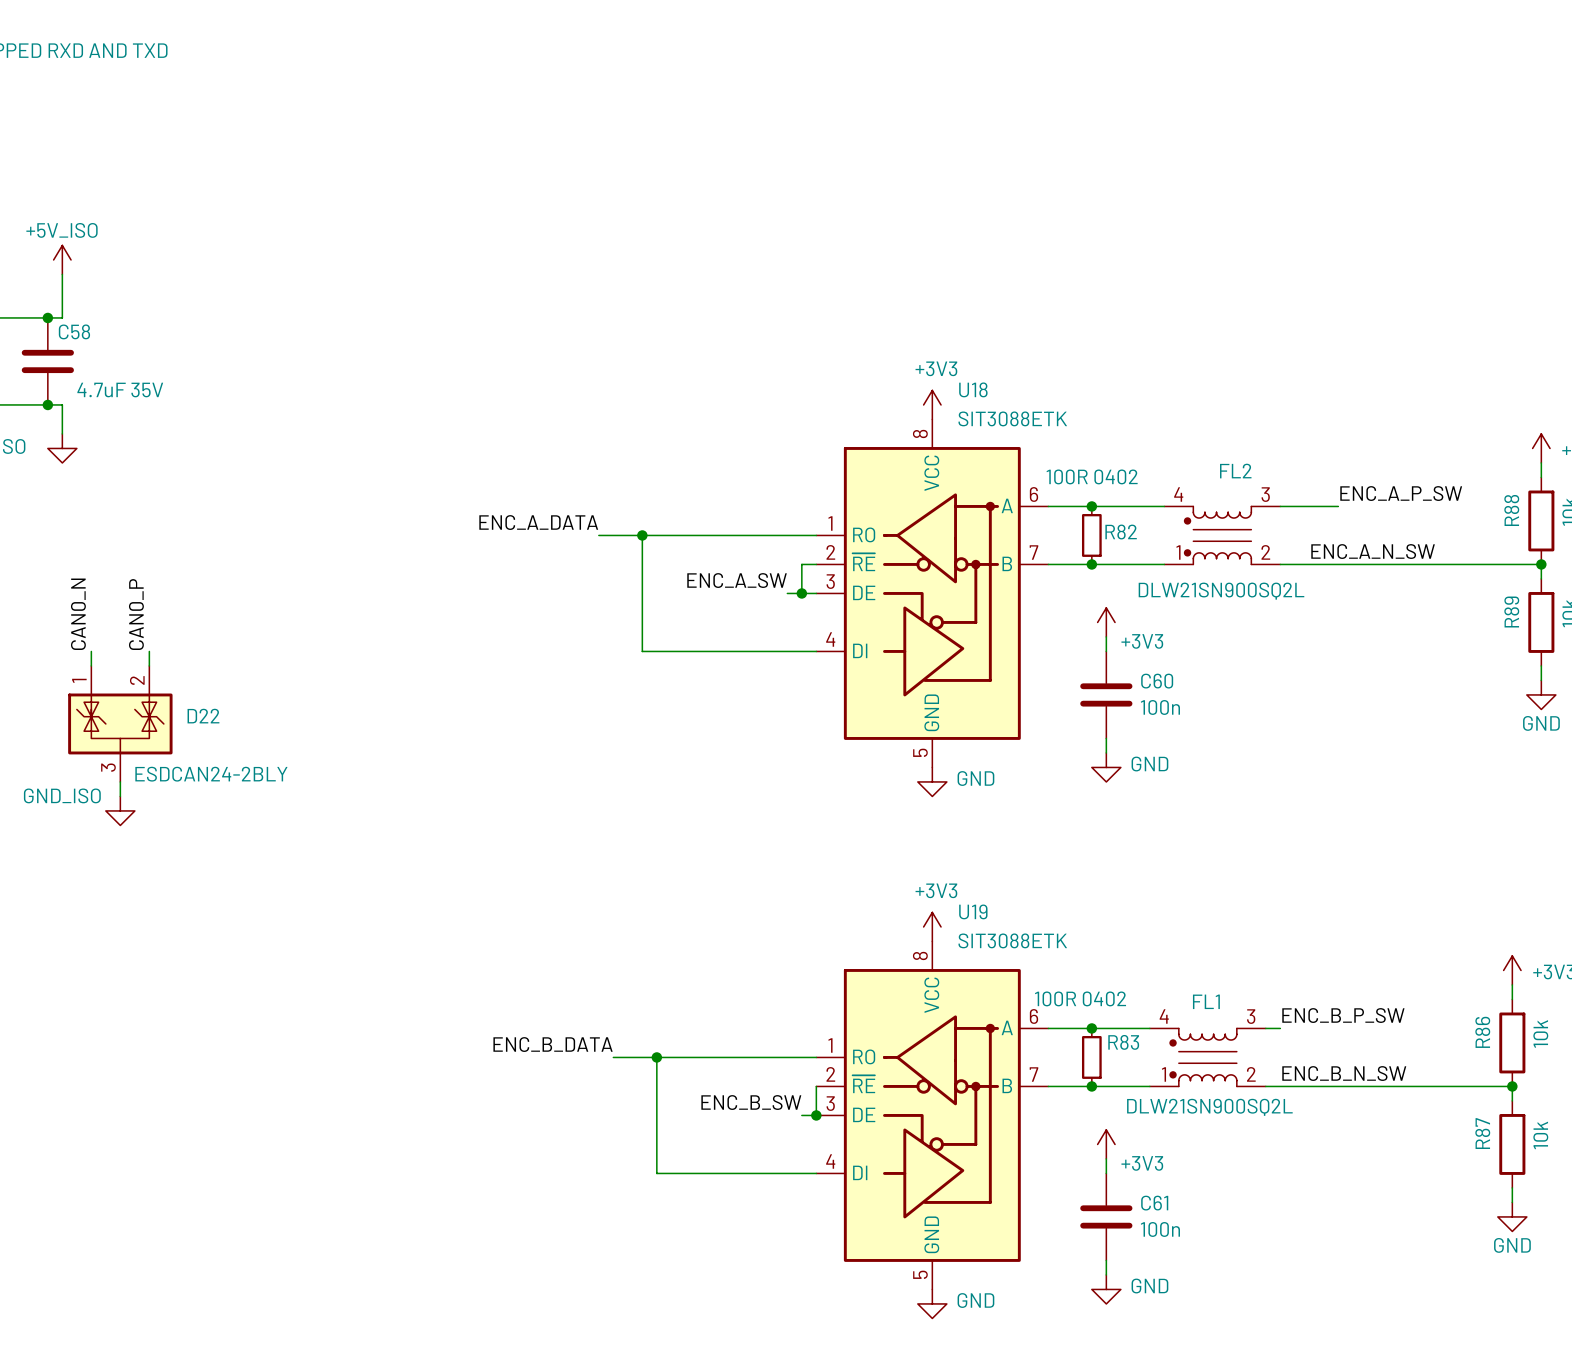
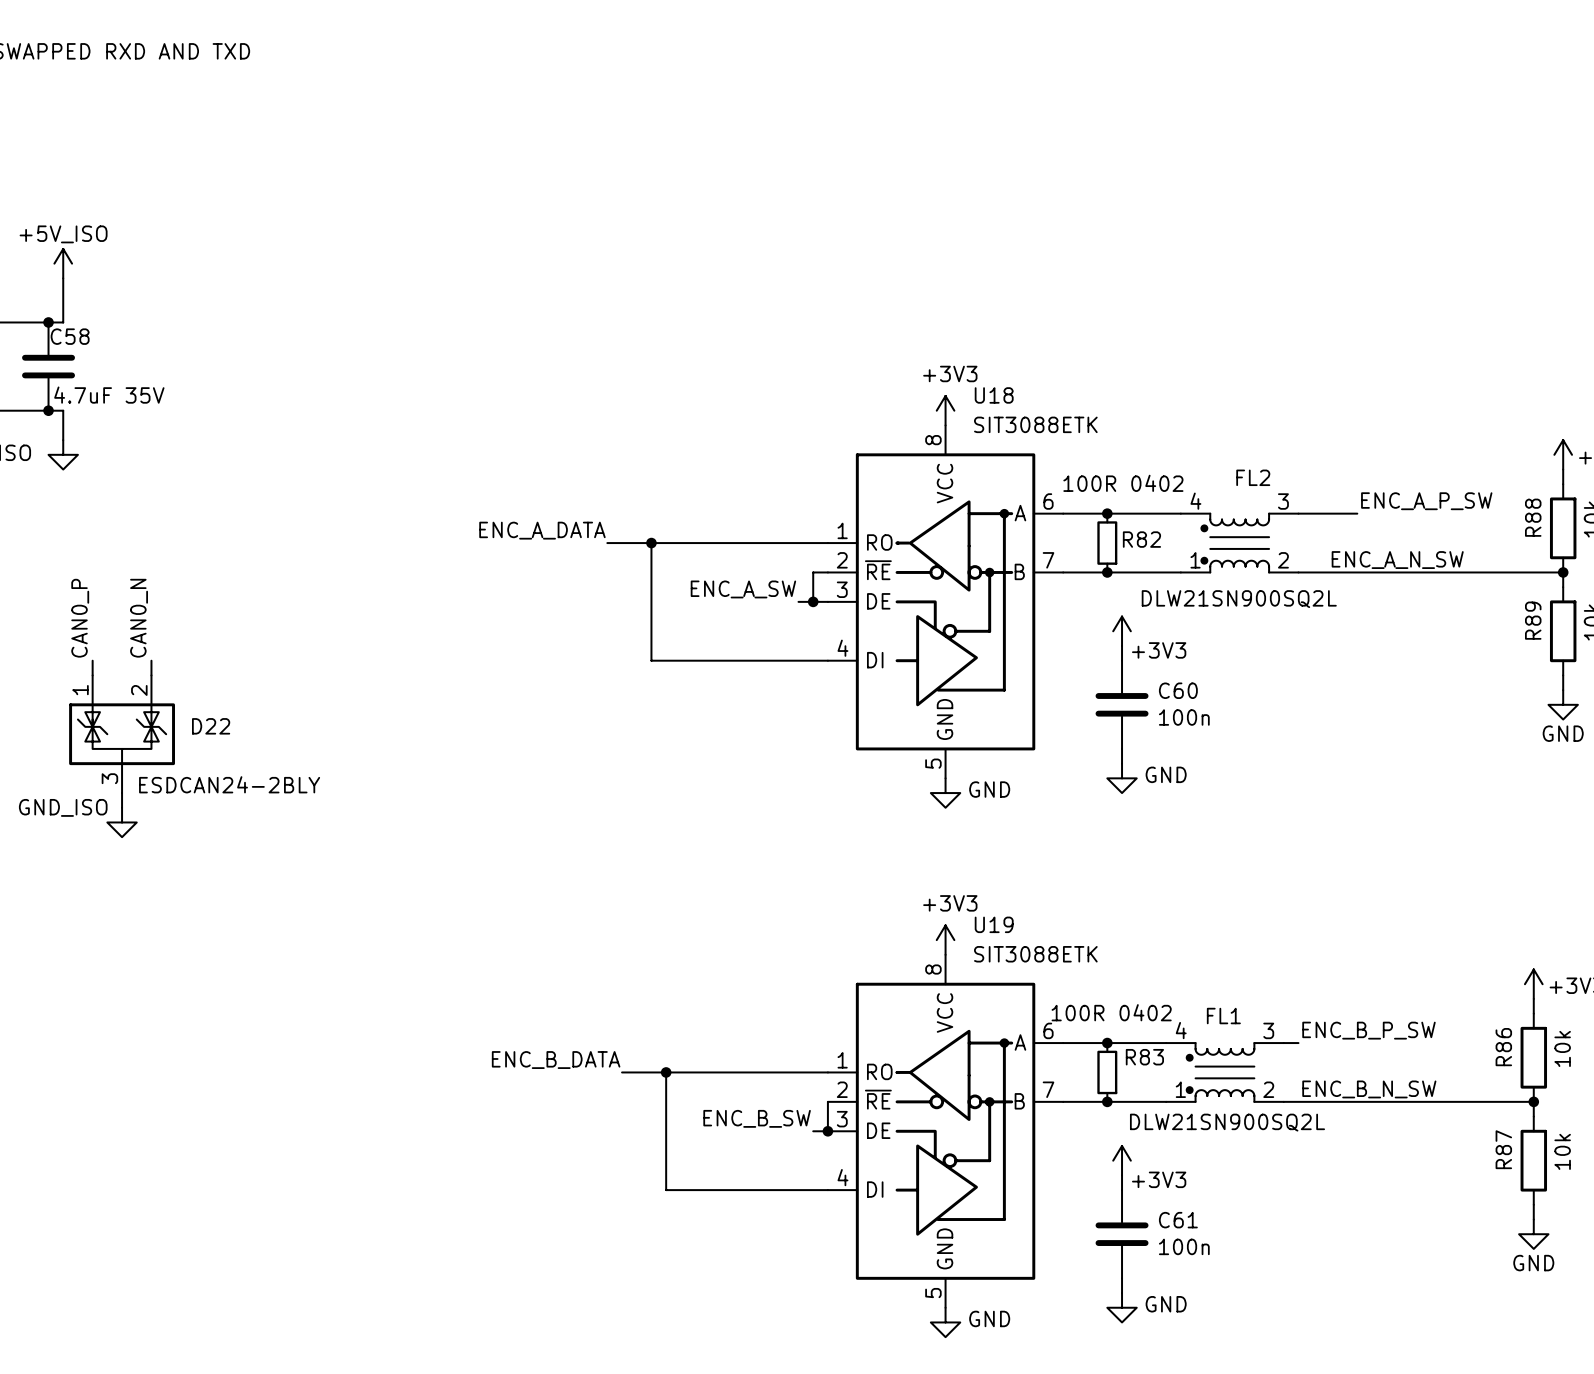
label: CAN0_N (78, 614) -> CAN0_P (80, 618)
label: CAN0_P (136, 614) -> CAN0_N (139, 618)

